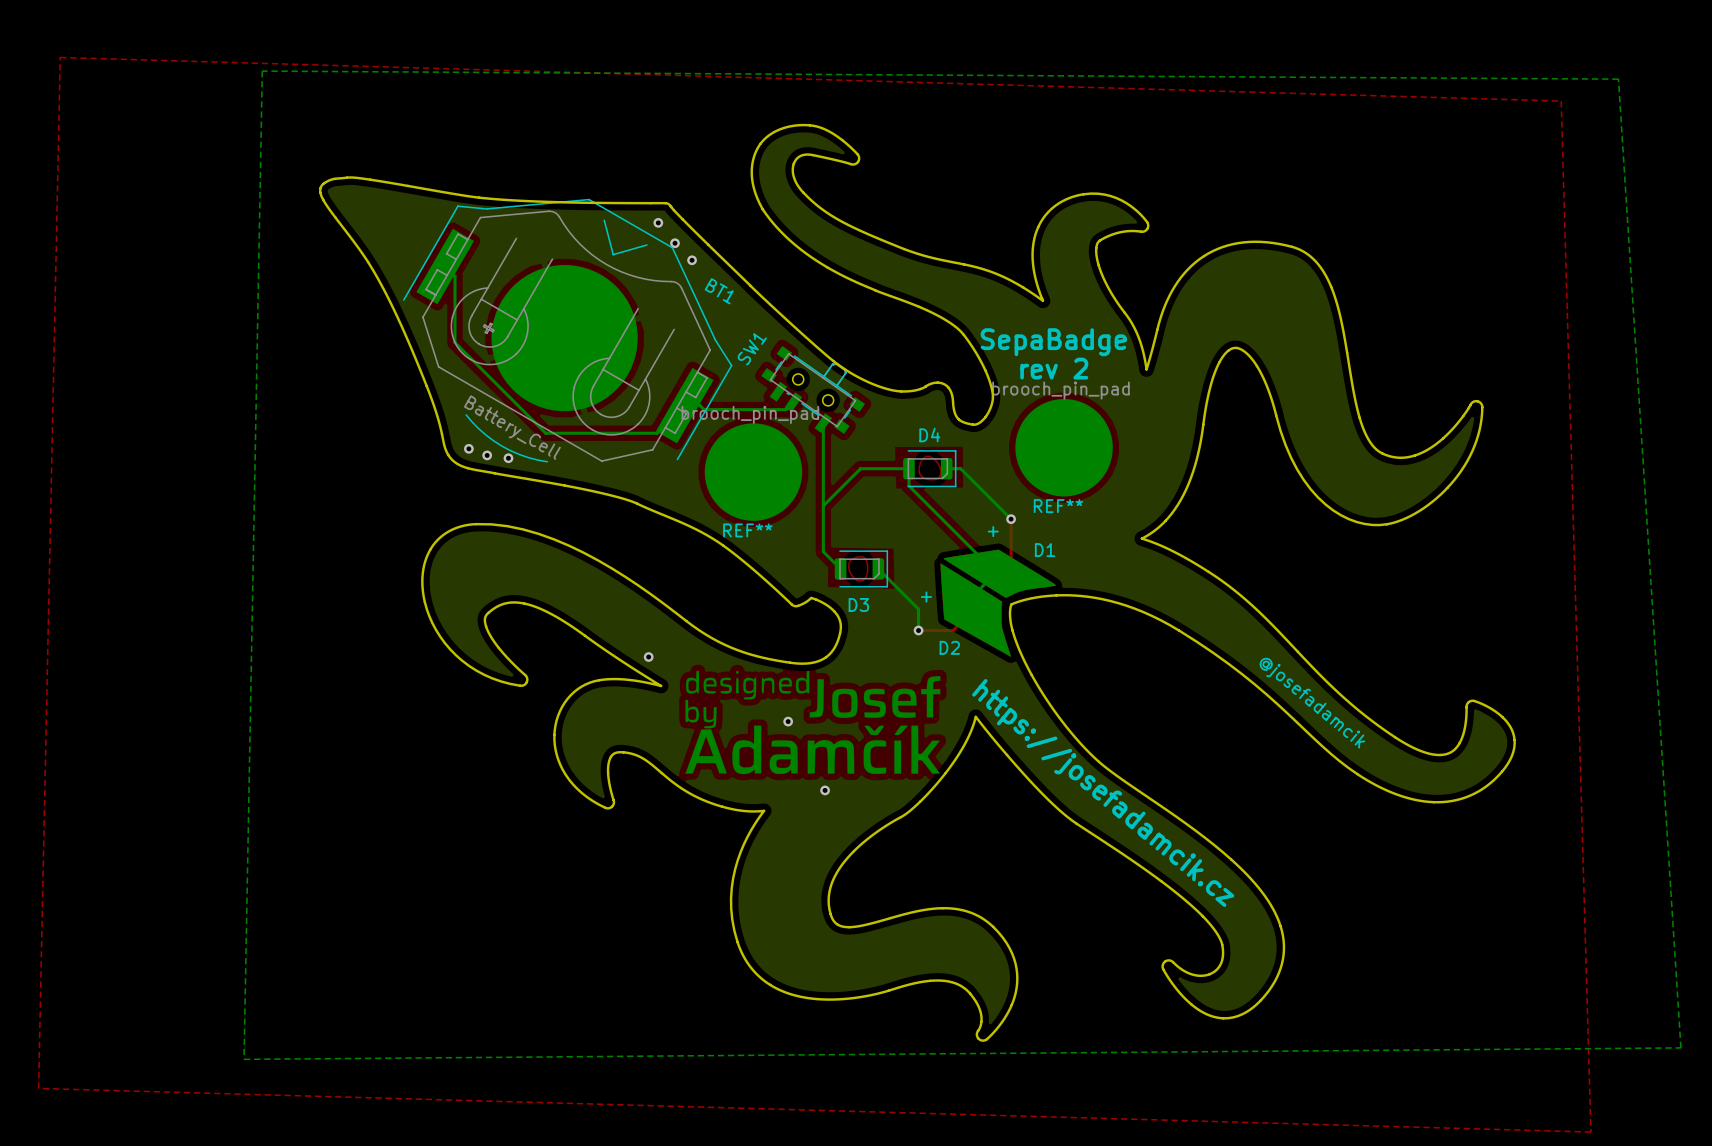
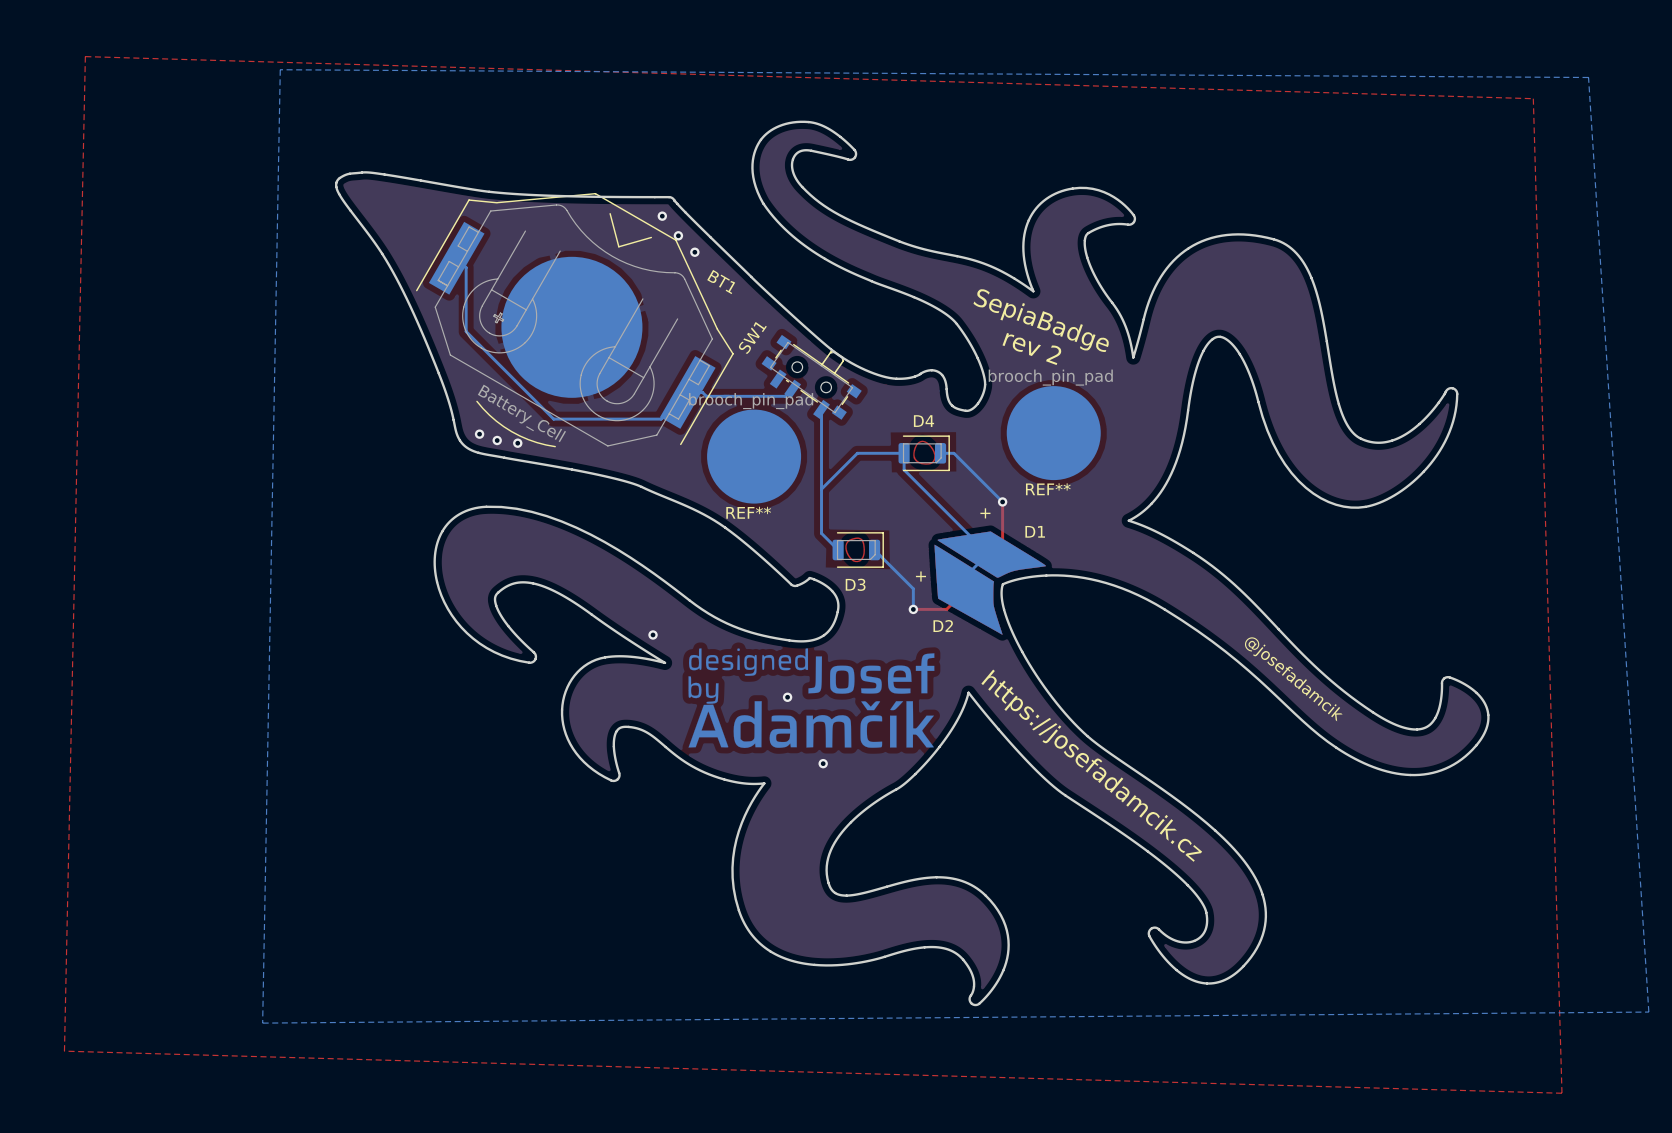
text: SepaBadge (1053, 342) -> SepiaBadge (1041, 320)
text rotation: 0° (1054, 368) -> 20° clockwise (1032, 349)

